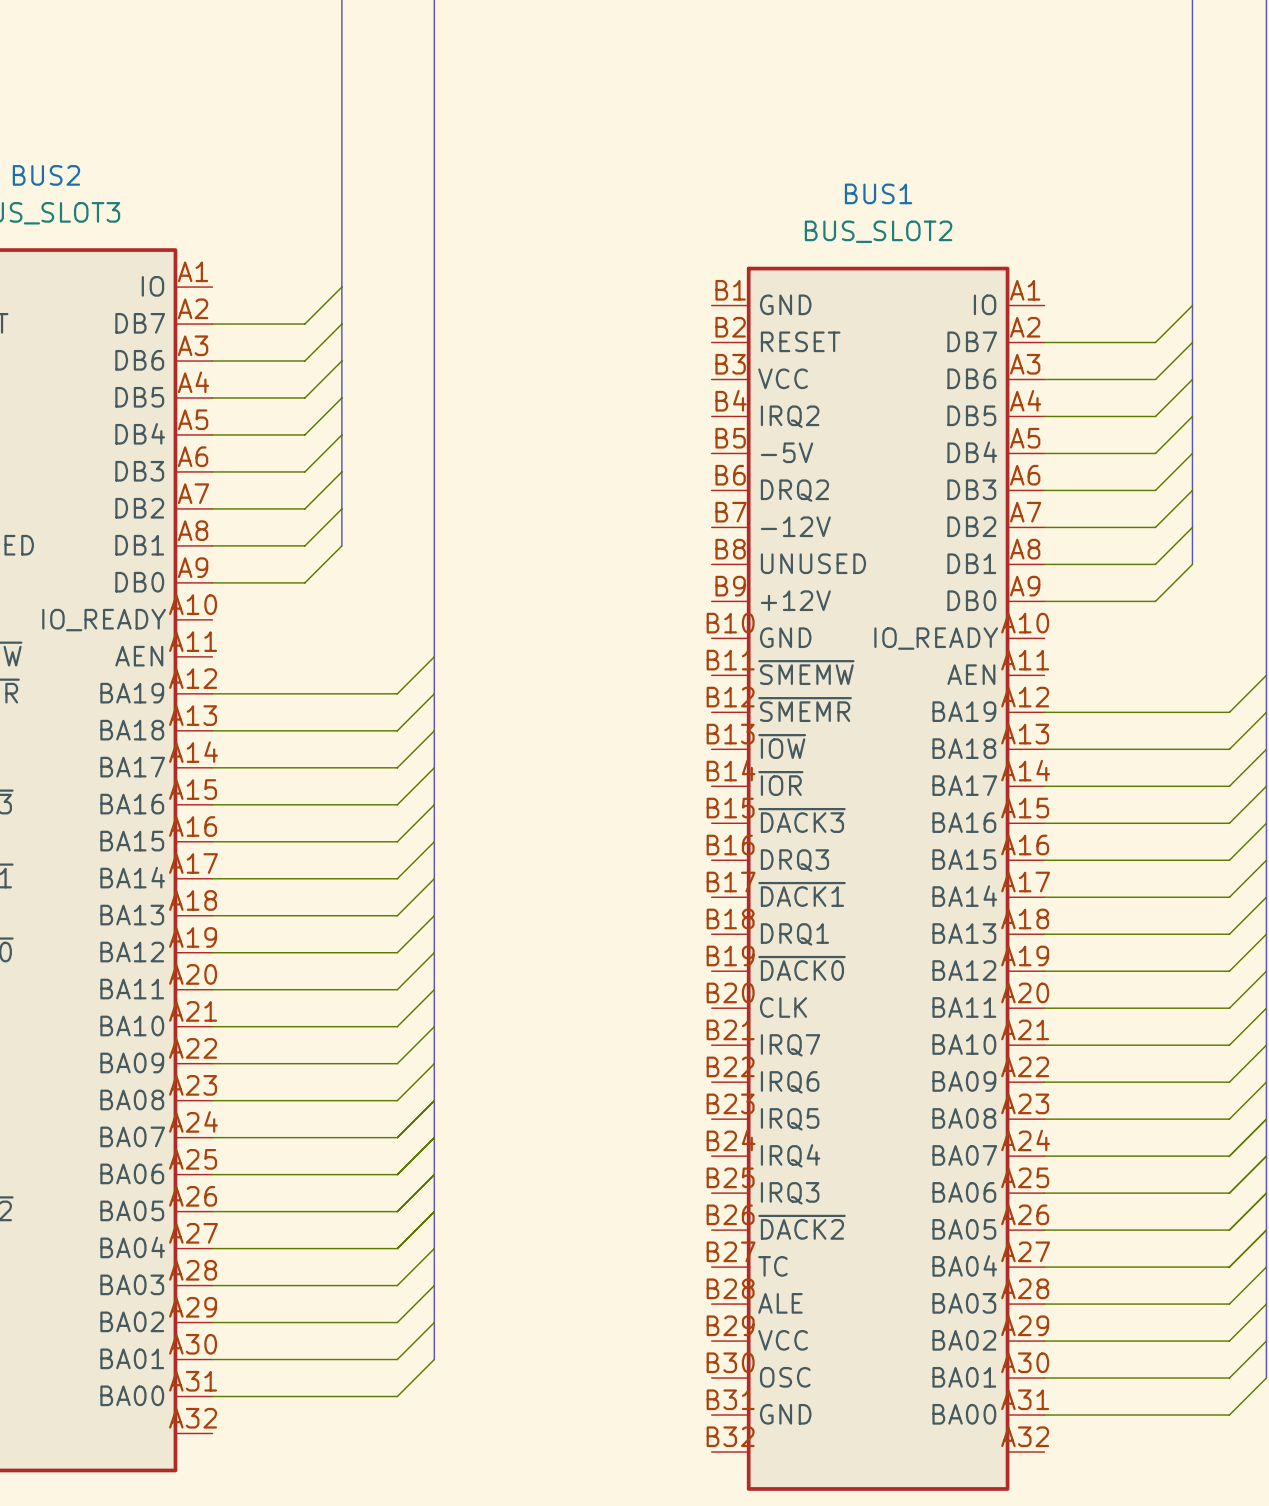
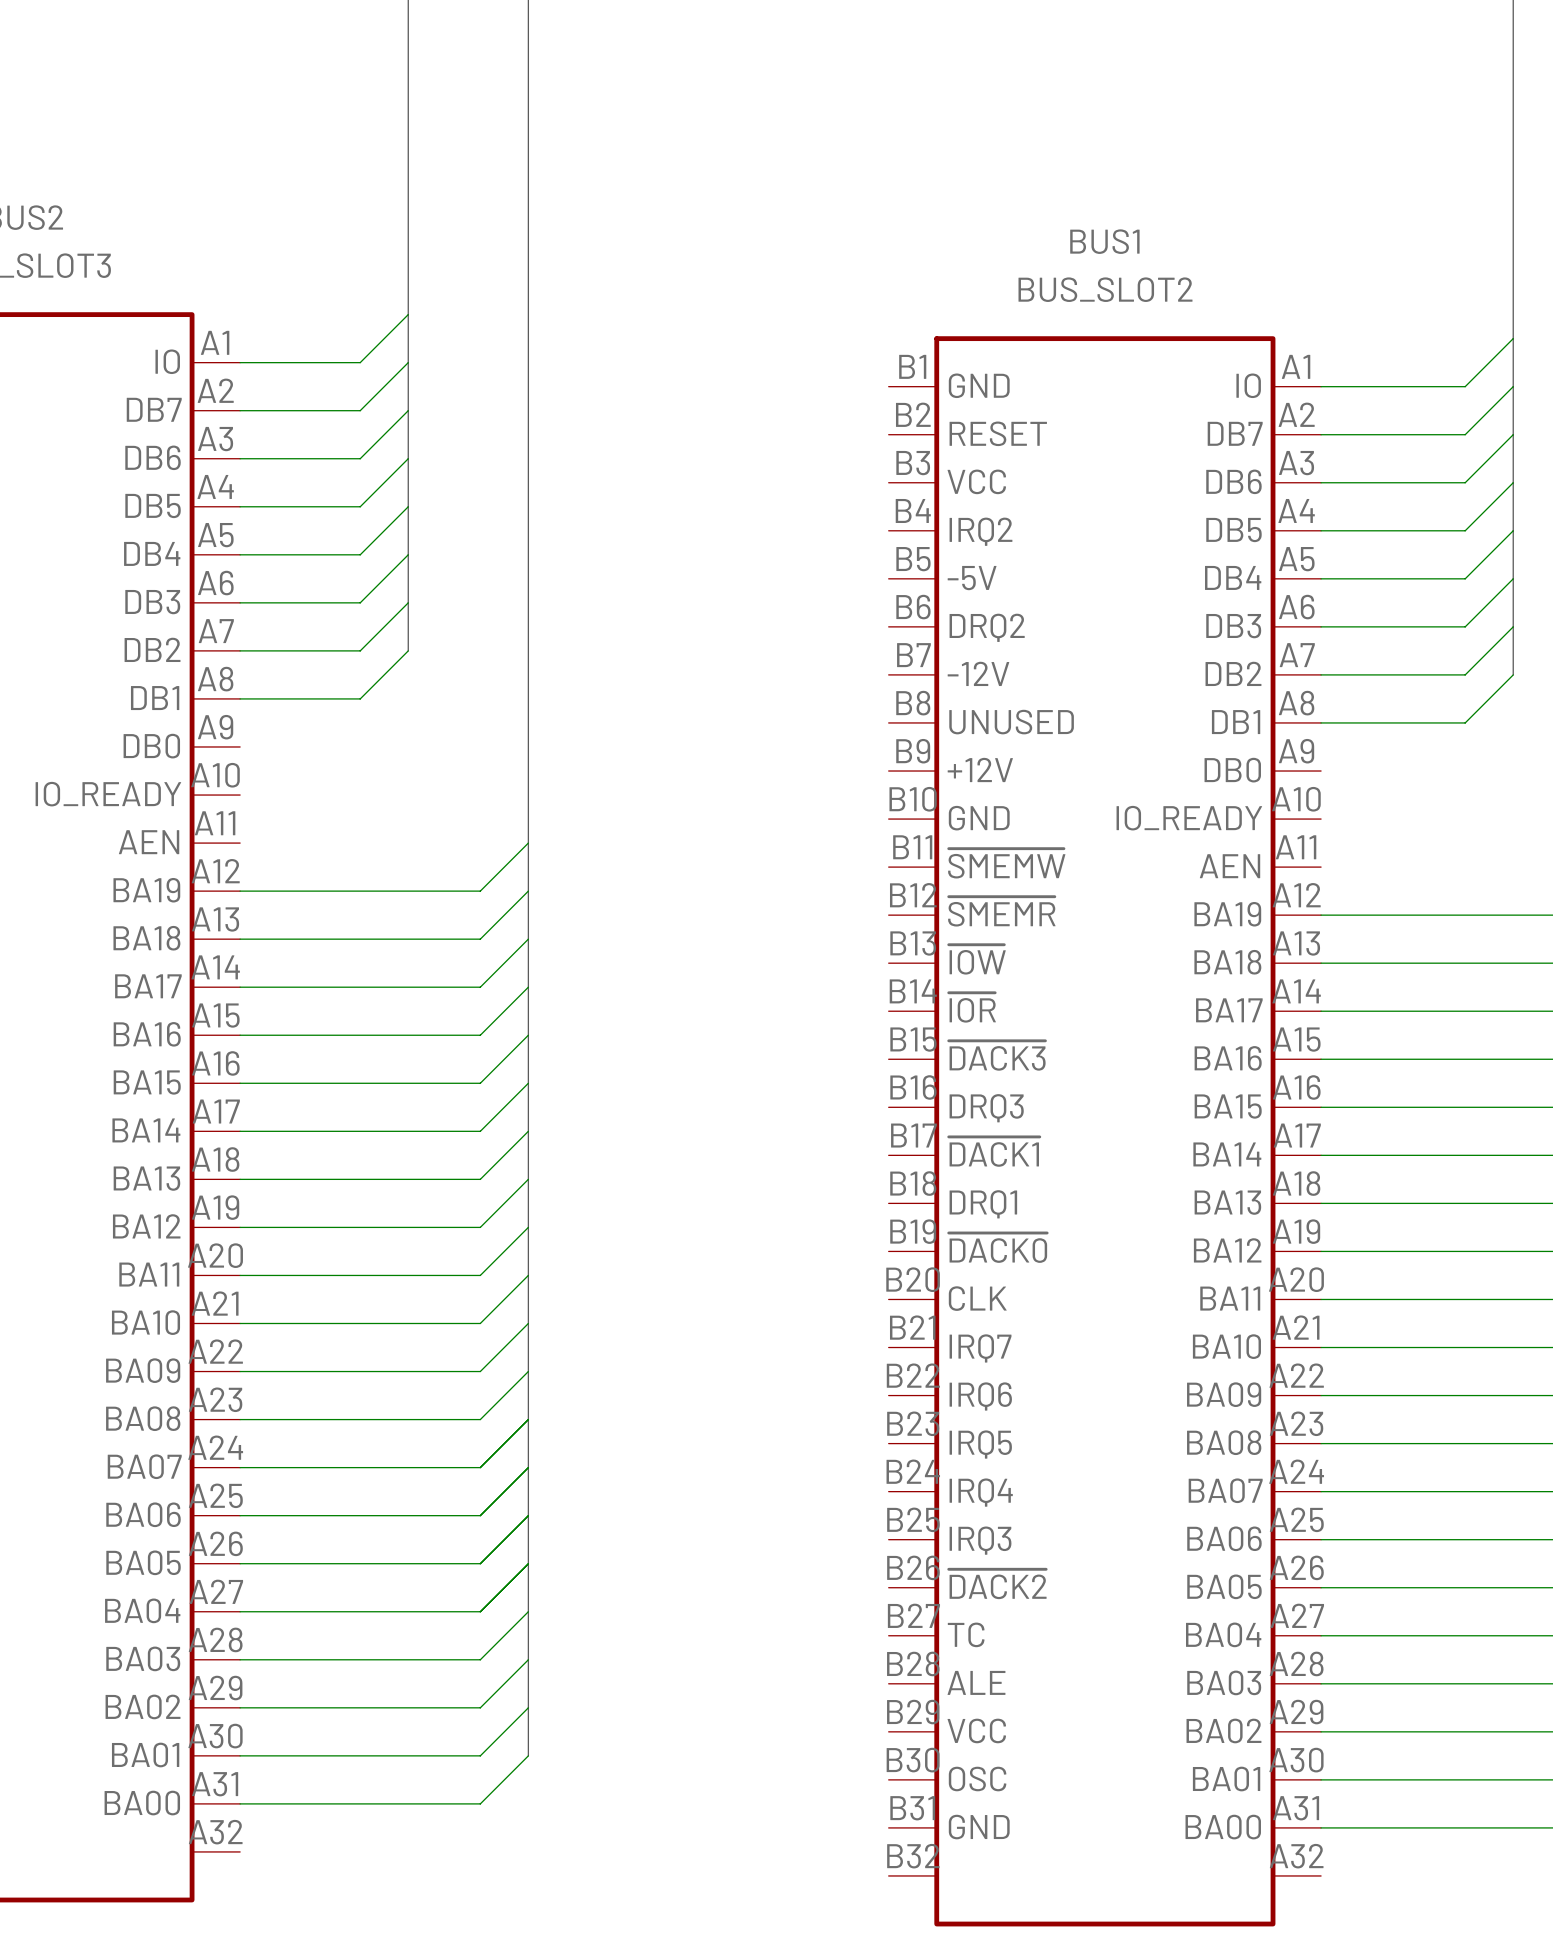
bus: (341, 508) (341, 545) -> none
bus: (1192, 527) (1192, 564) -> none
wire: (341, 545) (304, 582) (212, 582) -> (408, 314) (360, 362) (240, 362)
wire: (1192, 564) (1155, 601) (1044, 601) -> (1513, 338) (1465, 386) (1321, 386)

